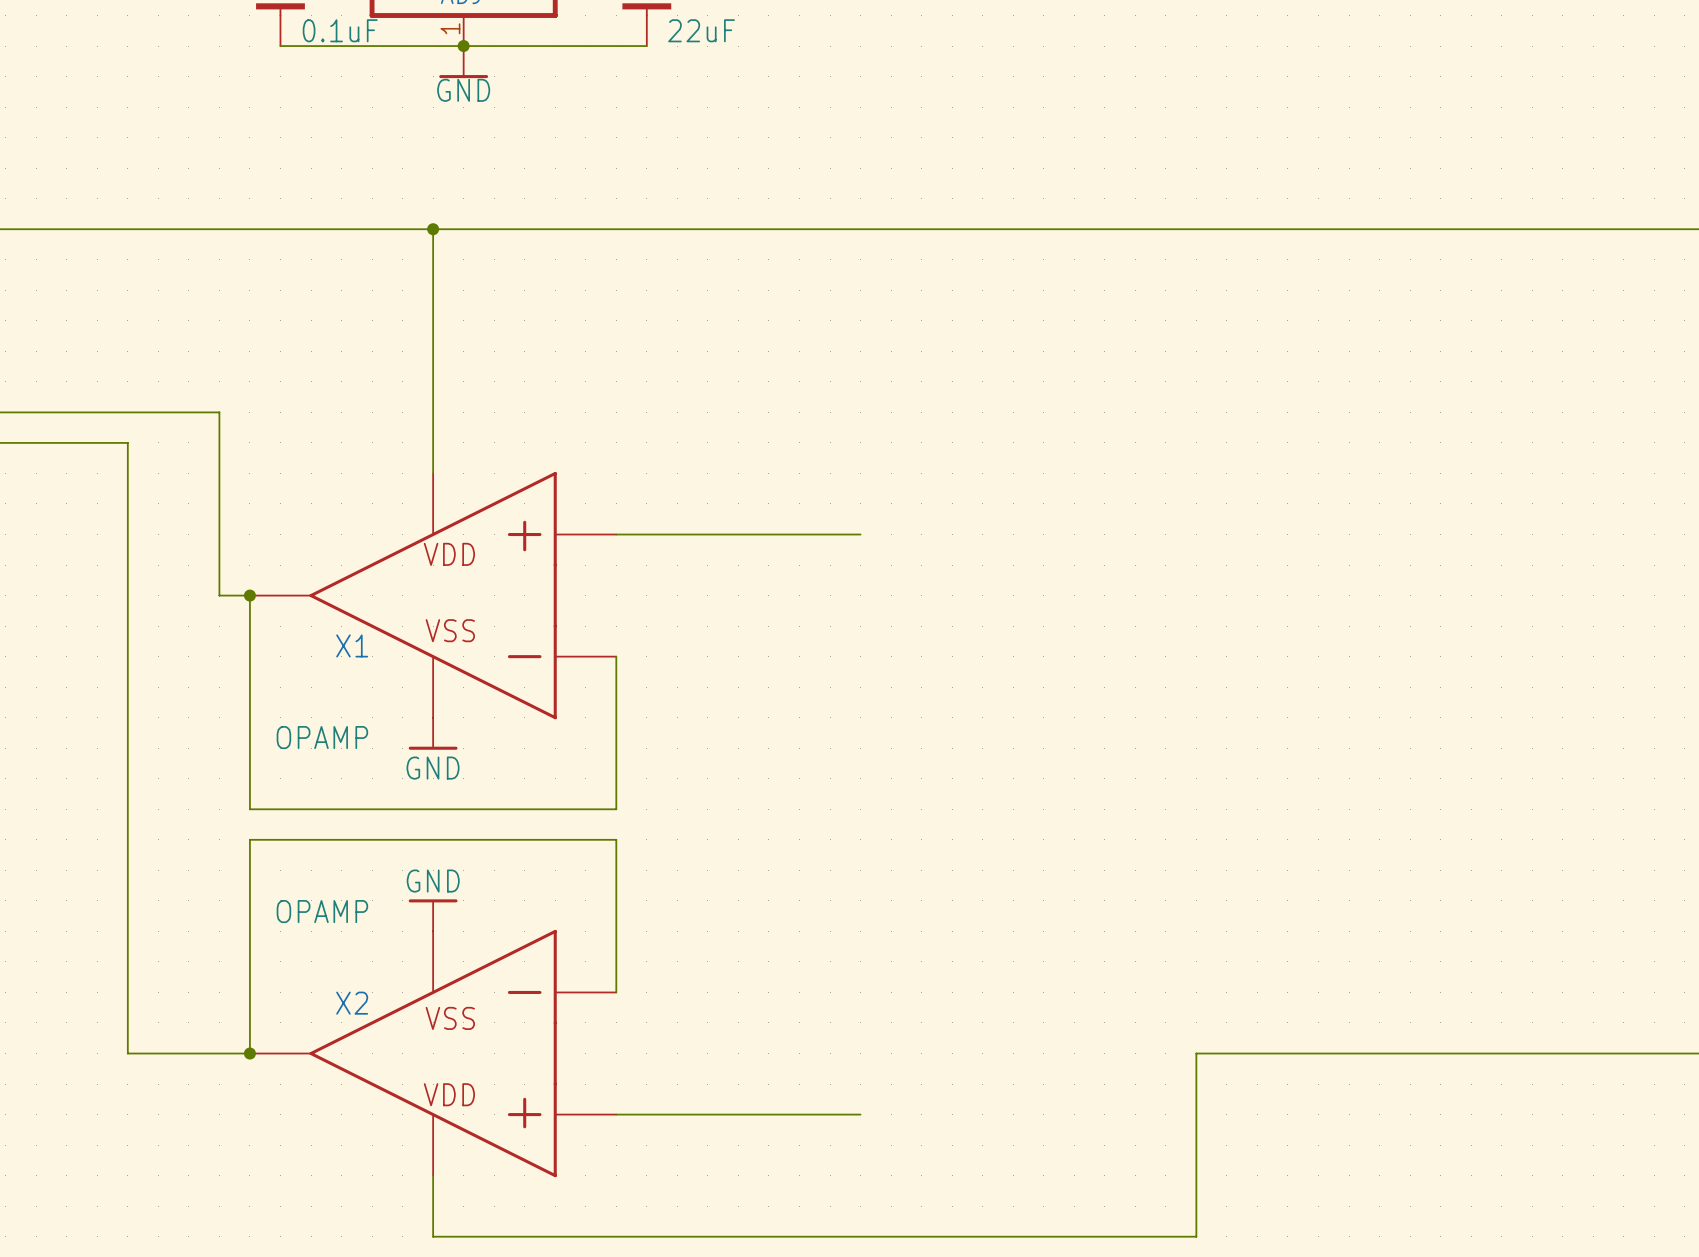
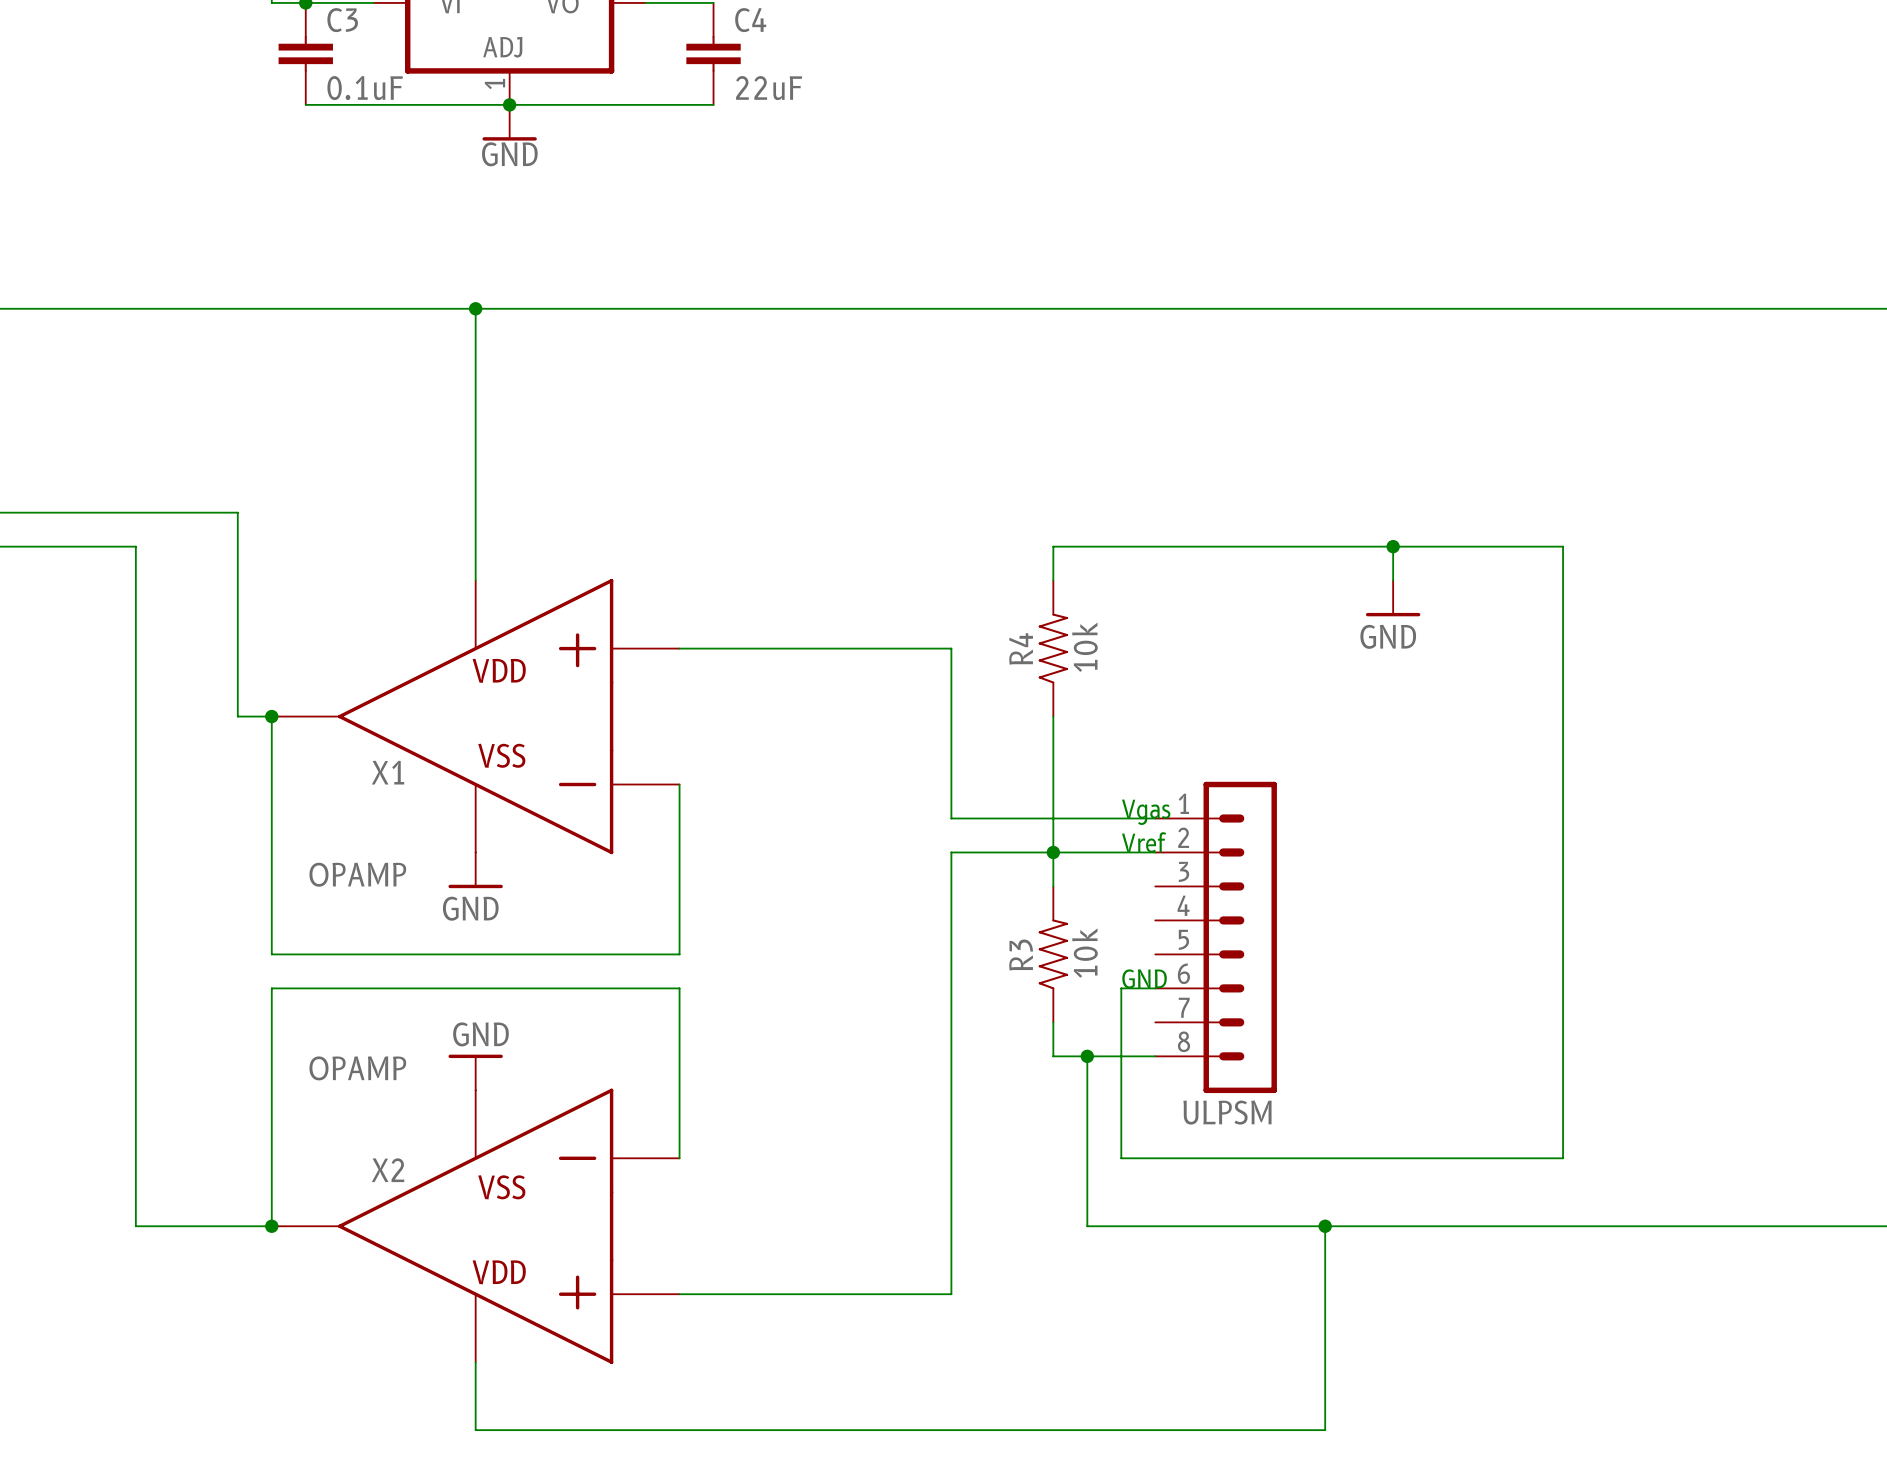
wire: none -> (1393, 546) (1393, 580)
junction: none -> (1393, 546)
wire: none -> (1053, 580) (1053, 546) (1563, 546) (1563, 1158) (1121, 1158) (1121, 988) (1155, 988)
power symbol: none -> GND (1393, 598)
wire: none -> (951, 648) (951, 818) (1155, 818)
R4: none -> 10k (1053, 648)
wire: none -> (1053, 716) (1053, 886)
text: none -> Vgas (1146, 812)
text: none -> Vref (1144, 842)
junction: none -> (1053, 852)
wire: none -> (1155, 852) (951, 852) (951, 1294)
ULPSM: none -> (1216, 937)
R3: none -> 10k (1053, 954)
text: none -> GND (1144, 978)
wire: none -> (1053, 1022) (1053, 1056) (1155, 1056)
wire: none -> (1087, 1056) (1087, 1226) (1325, 1226)
junction: none -> (1087, 1056)
junction: none -> (1325, 1226)

